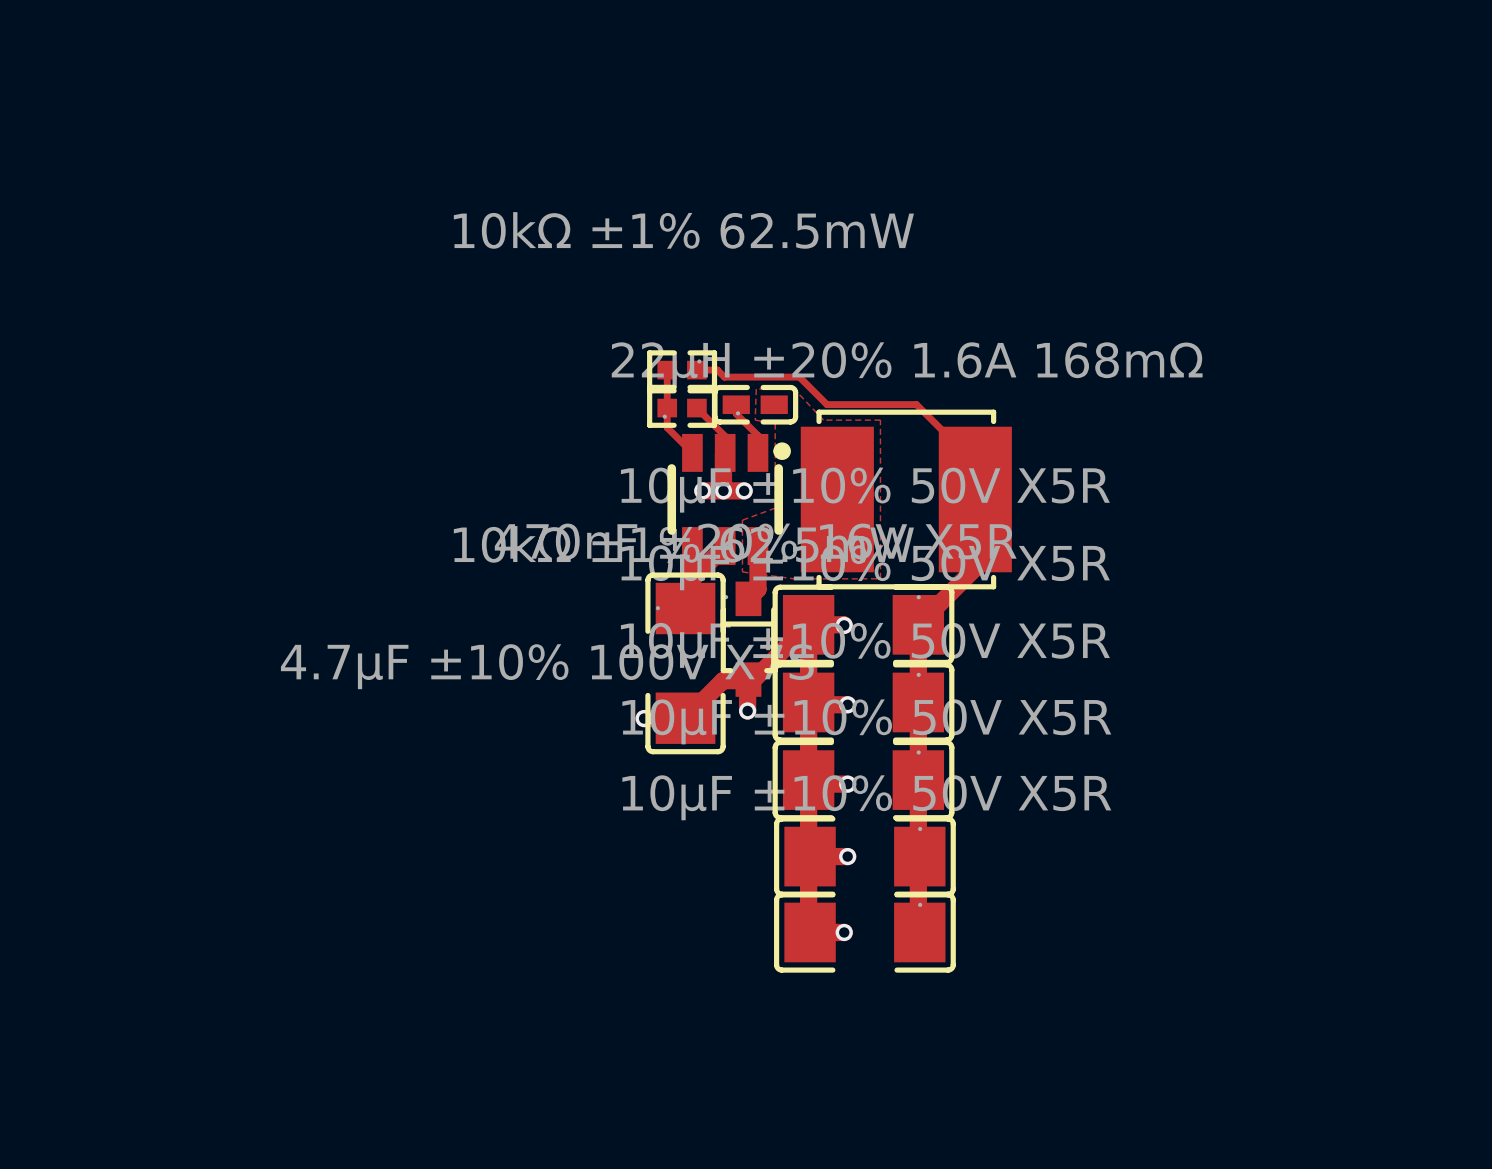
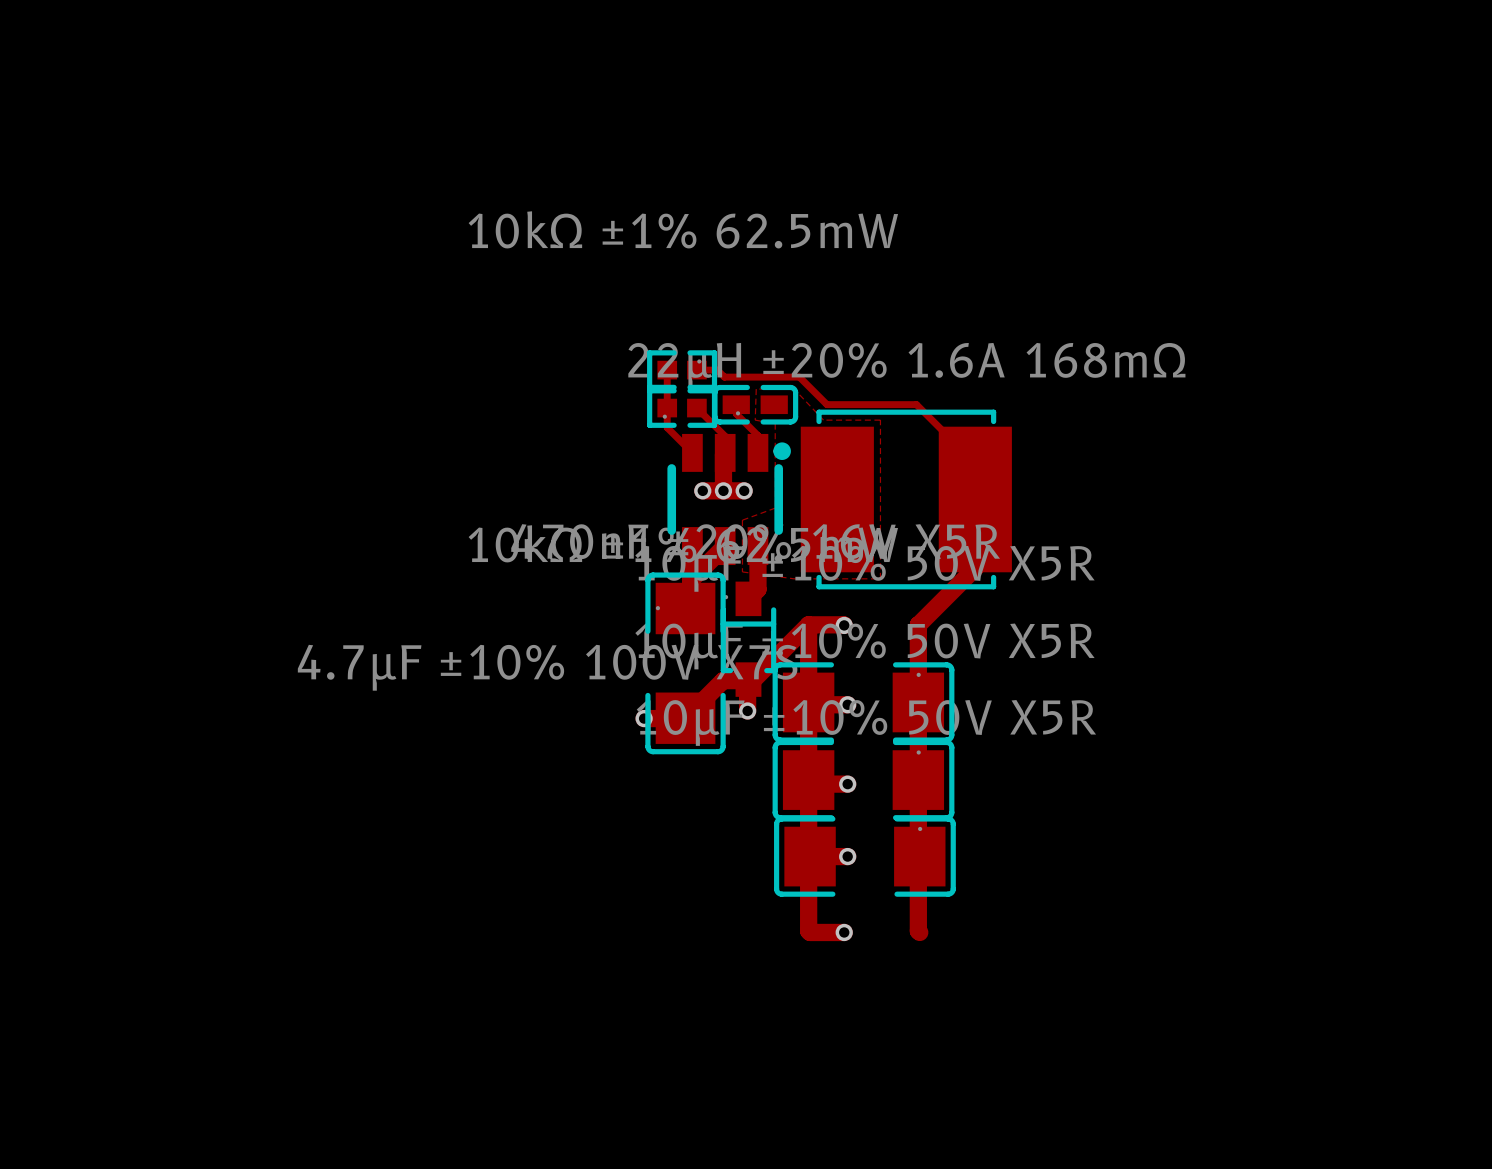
part: 10µF ±10% 50V X5R (863, 624) -> none
part: 10µF ±10% 50V X5R (864, 932) -> none

